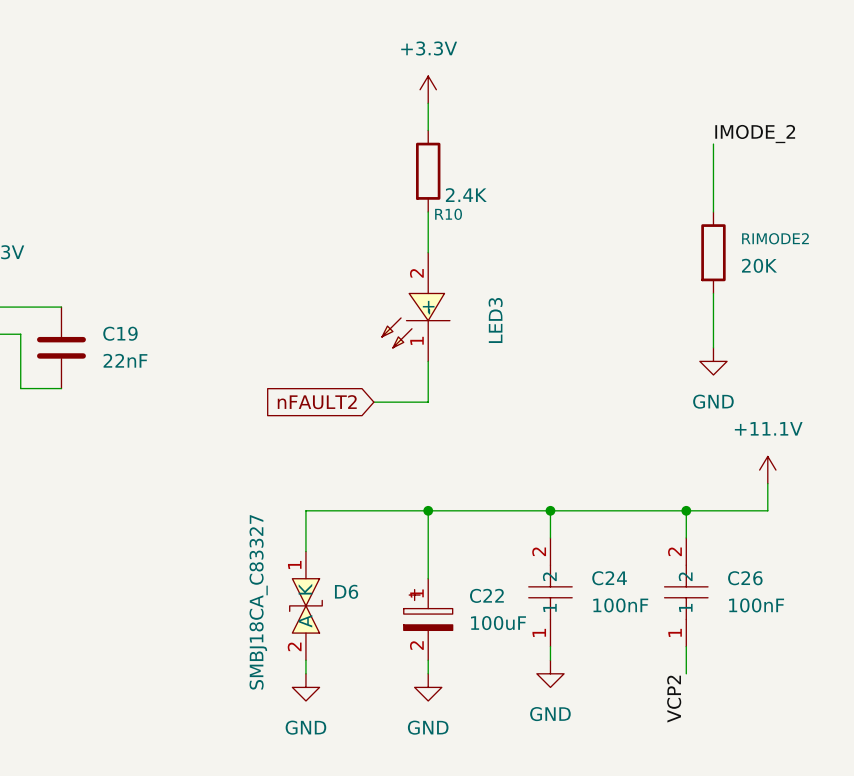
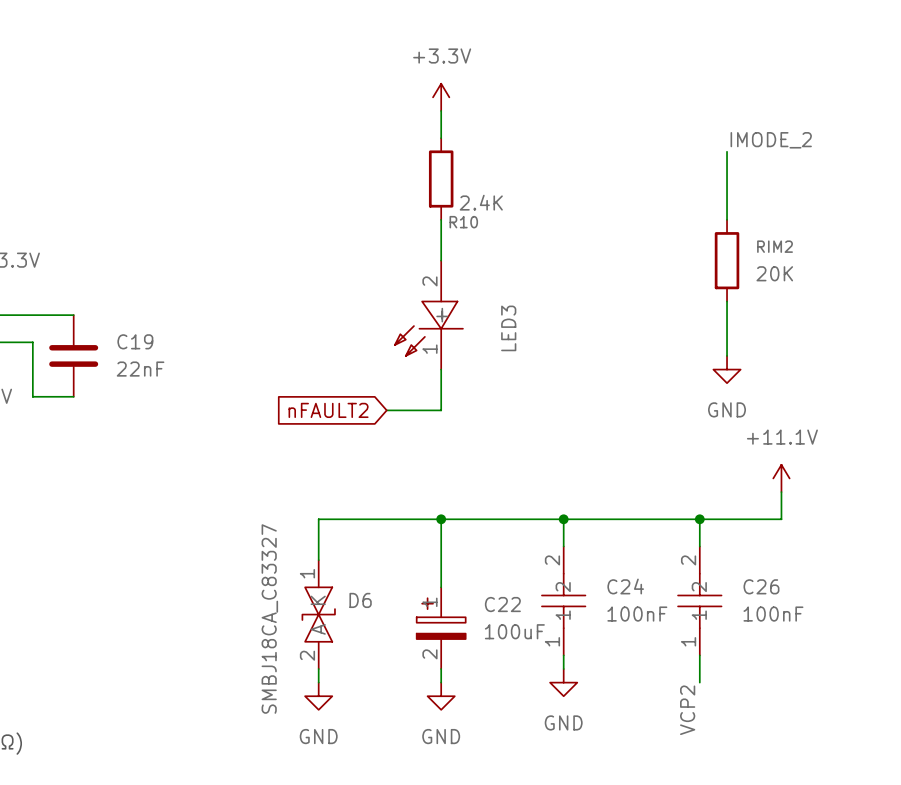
RIMODE2 name: RIMODE2 (775, 238) -> RIM2 (775, 246)

